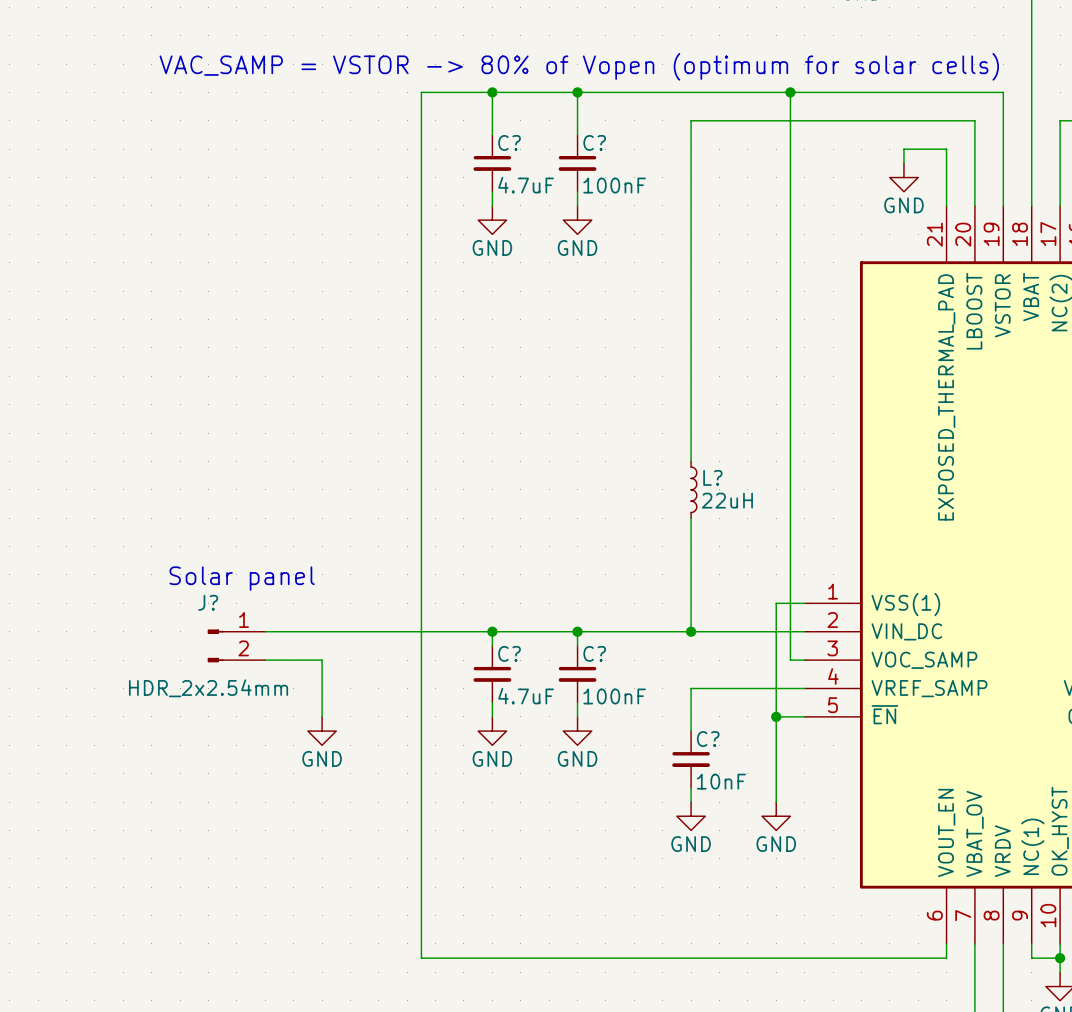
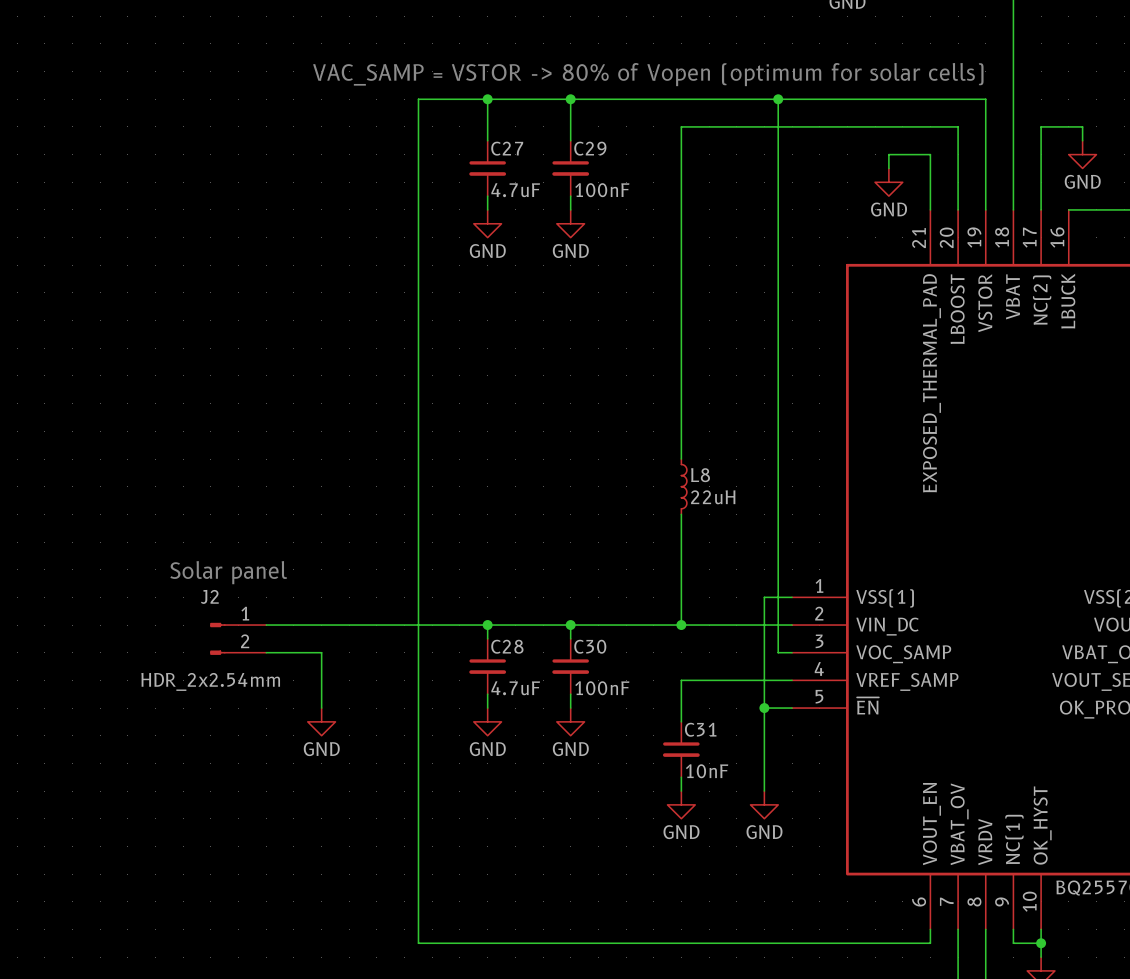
C? name: C? (509, 142) -> C27 (507, 148)
C? name: C? (594, 142) -> C29 (590, 148)
L? name: L? (712, 477) -> L8 (700, 475)
J? name: J? (208, 602) -> J2 (209, 596)
C? name: C? (509, 653) -> C28 (507, 646)
C? name: C? (594, 653) -> C30 (590, 646)
C? name: C? (708, 739) -> C31 (700, 729)

